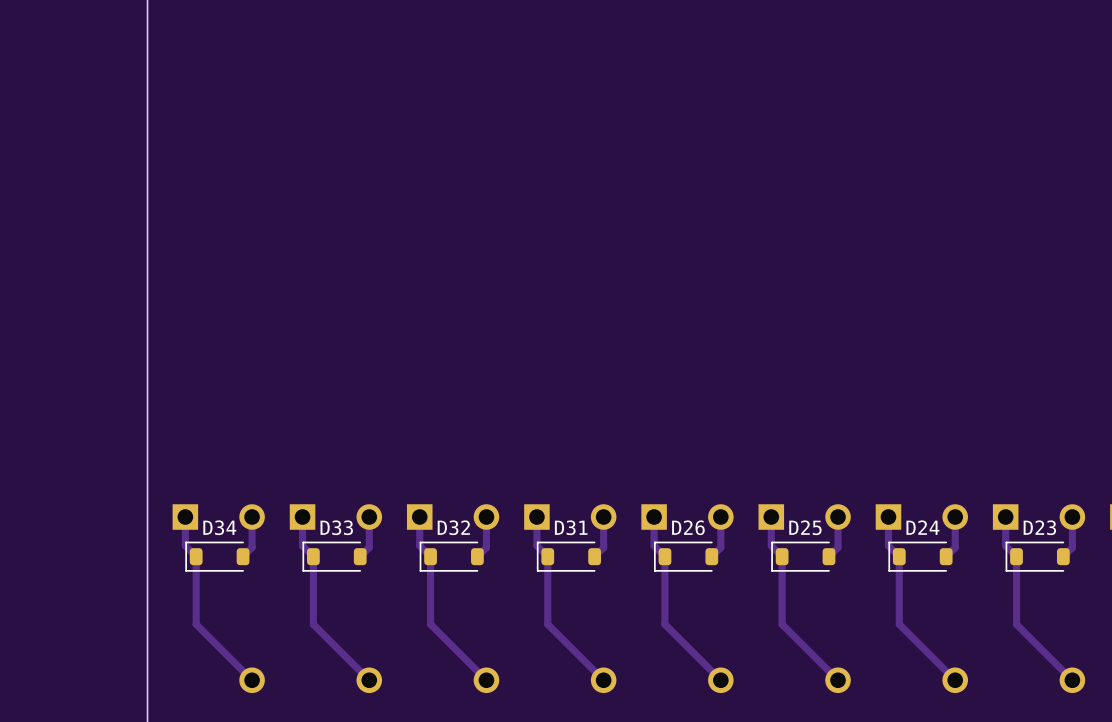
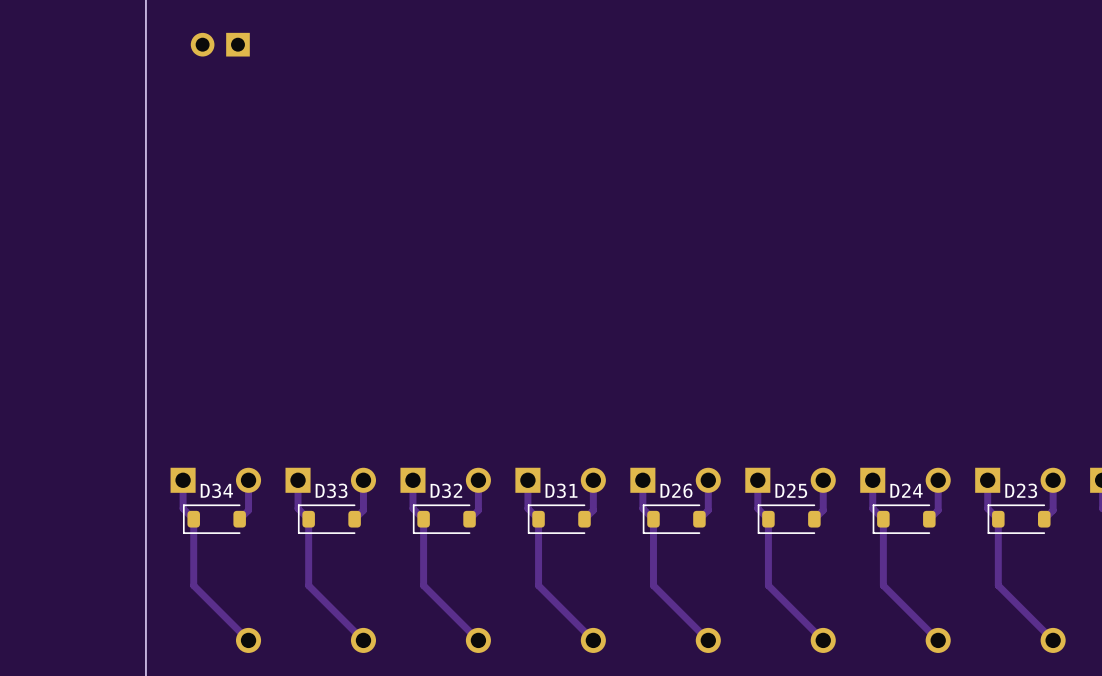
part: none -> (220, 44)

